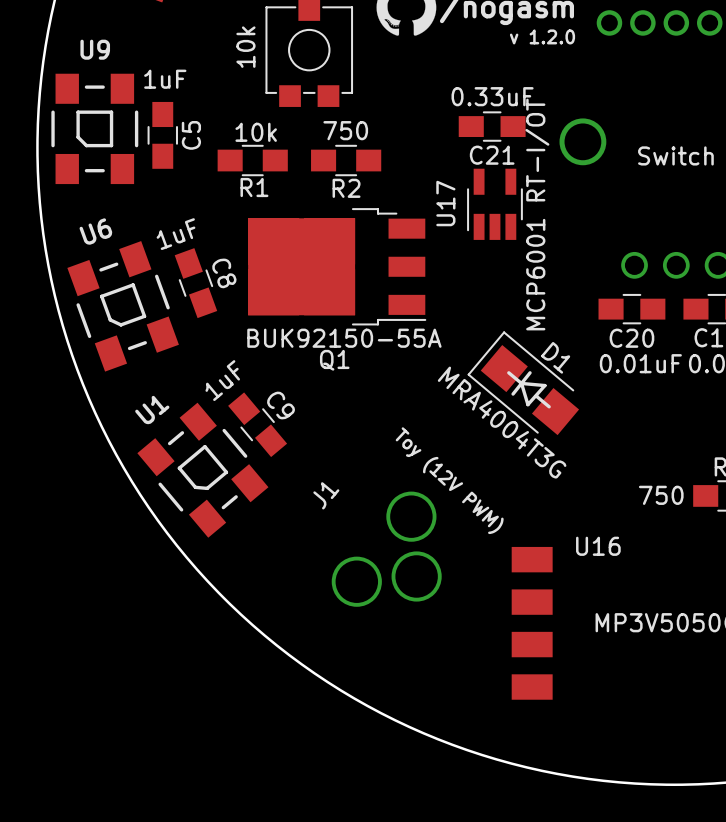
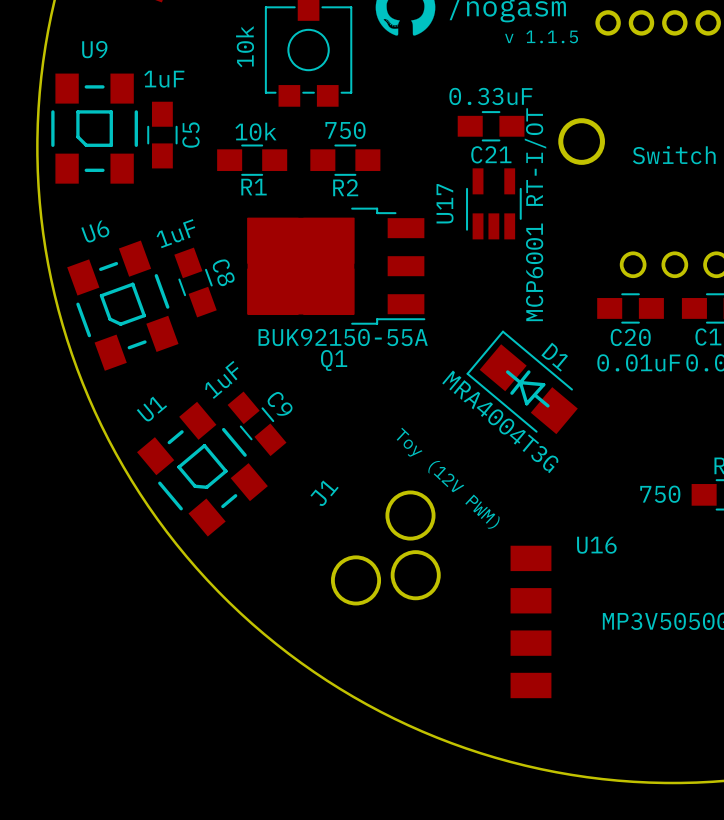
text: v 1.2.0 (542, 36) -> v 1.1.5 (541, 36)

